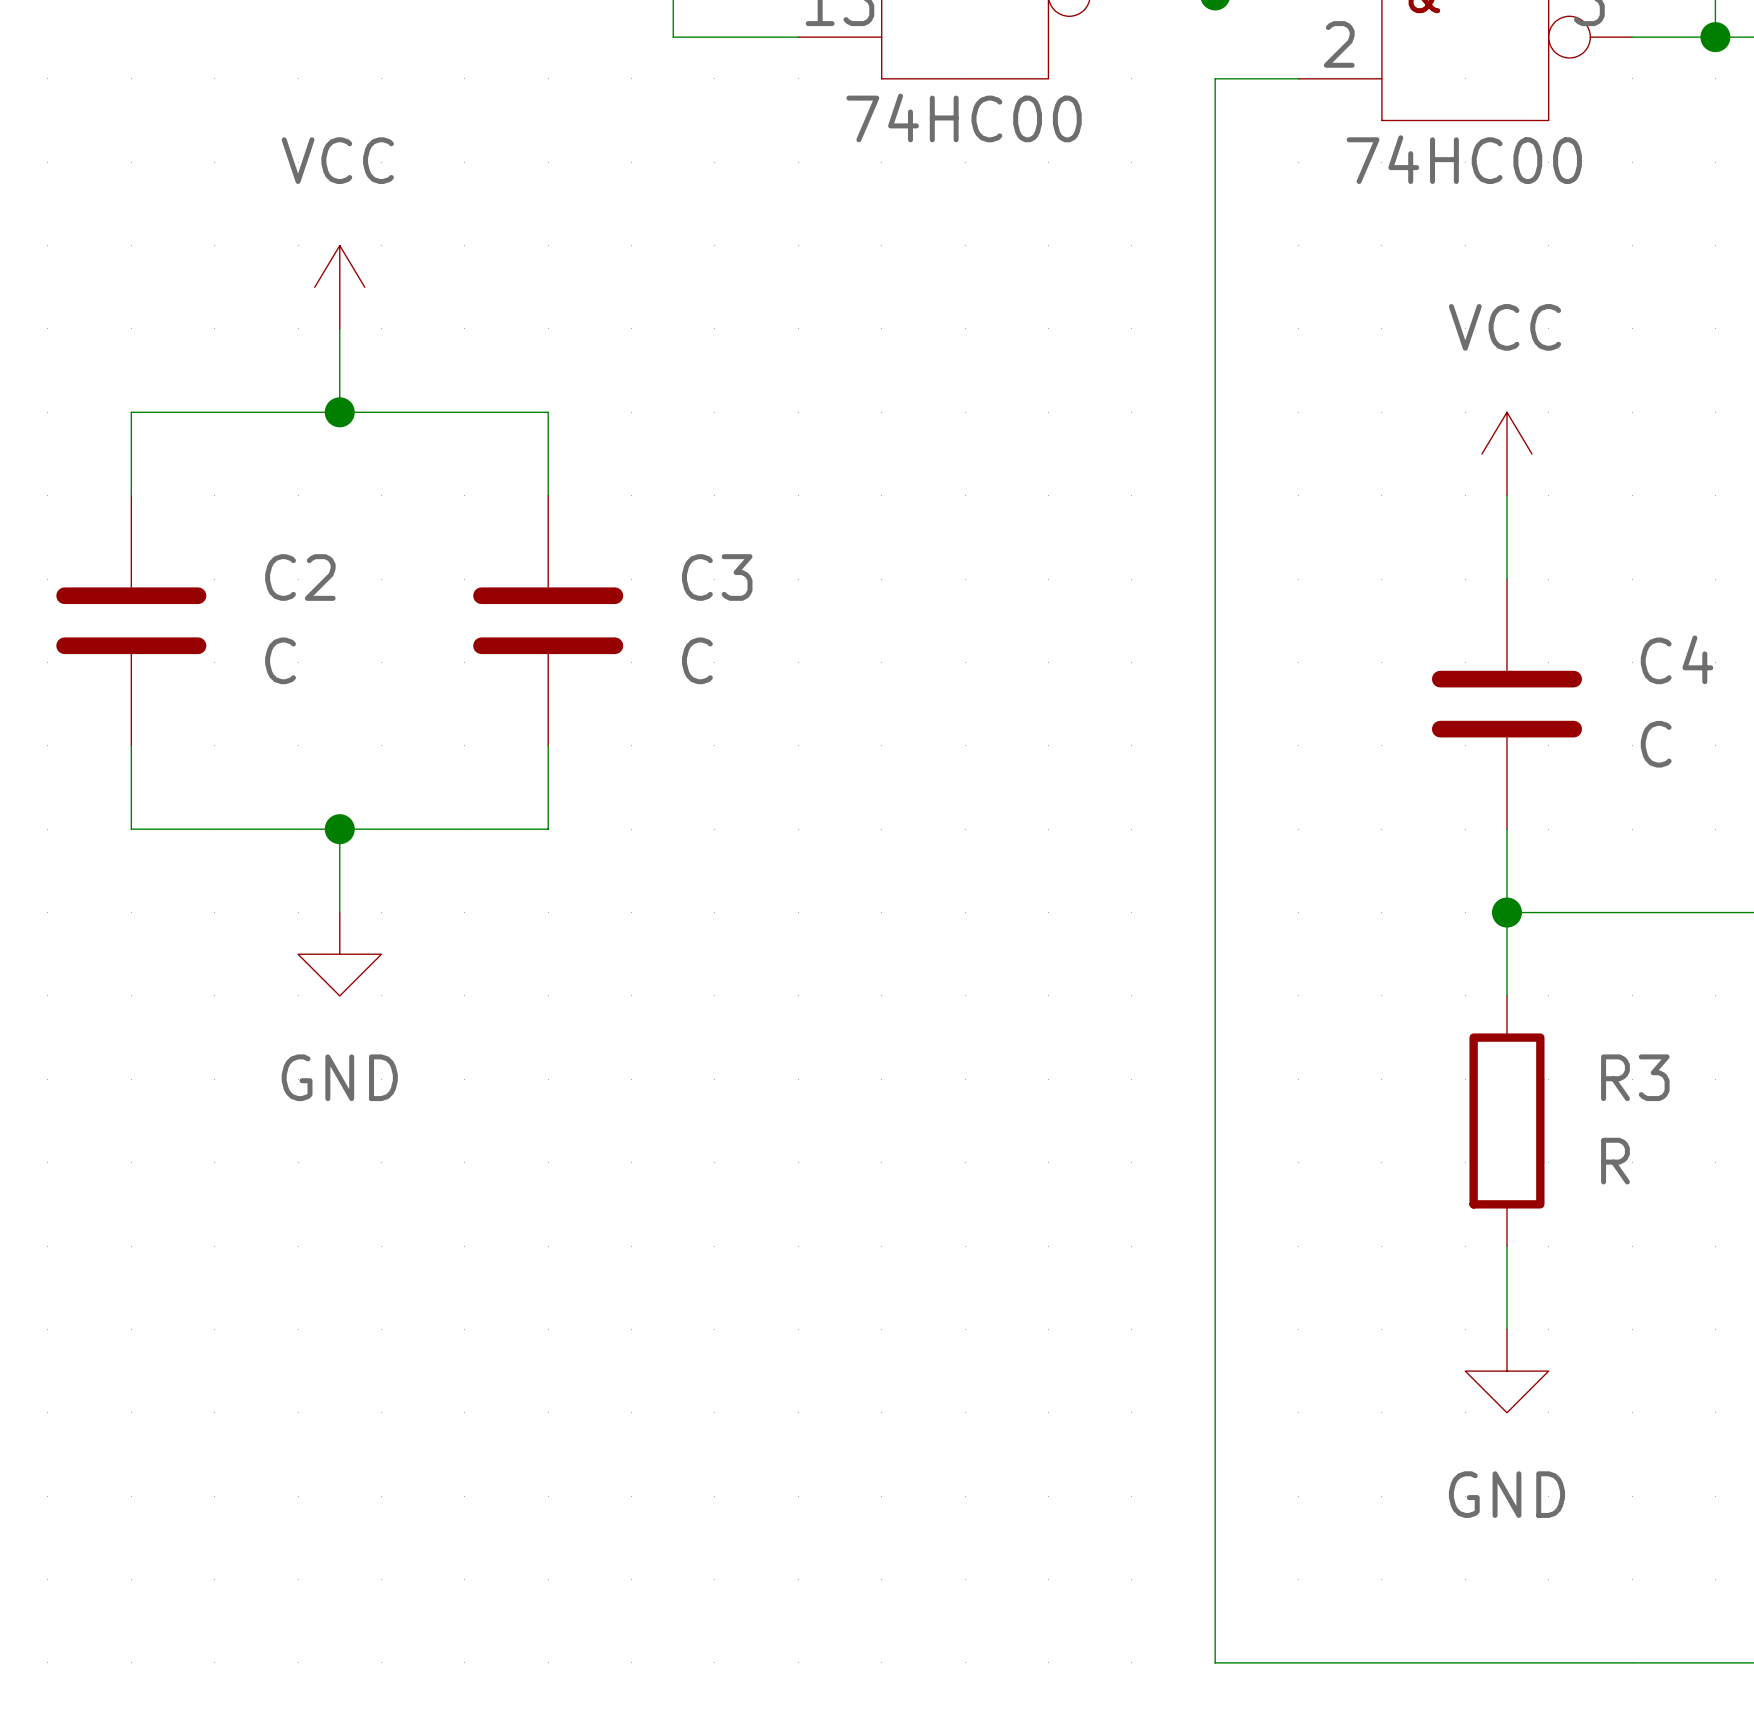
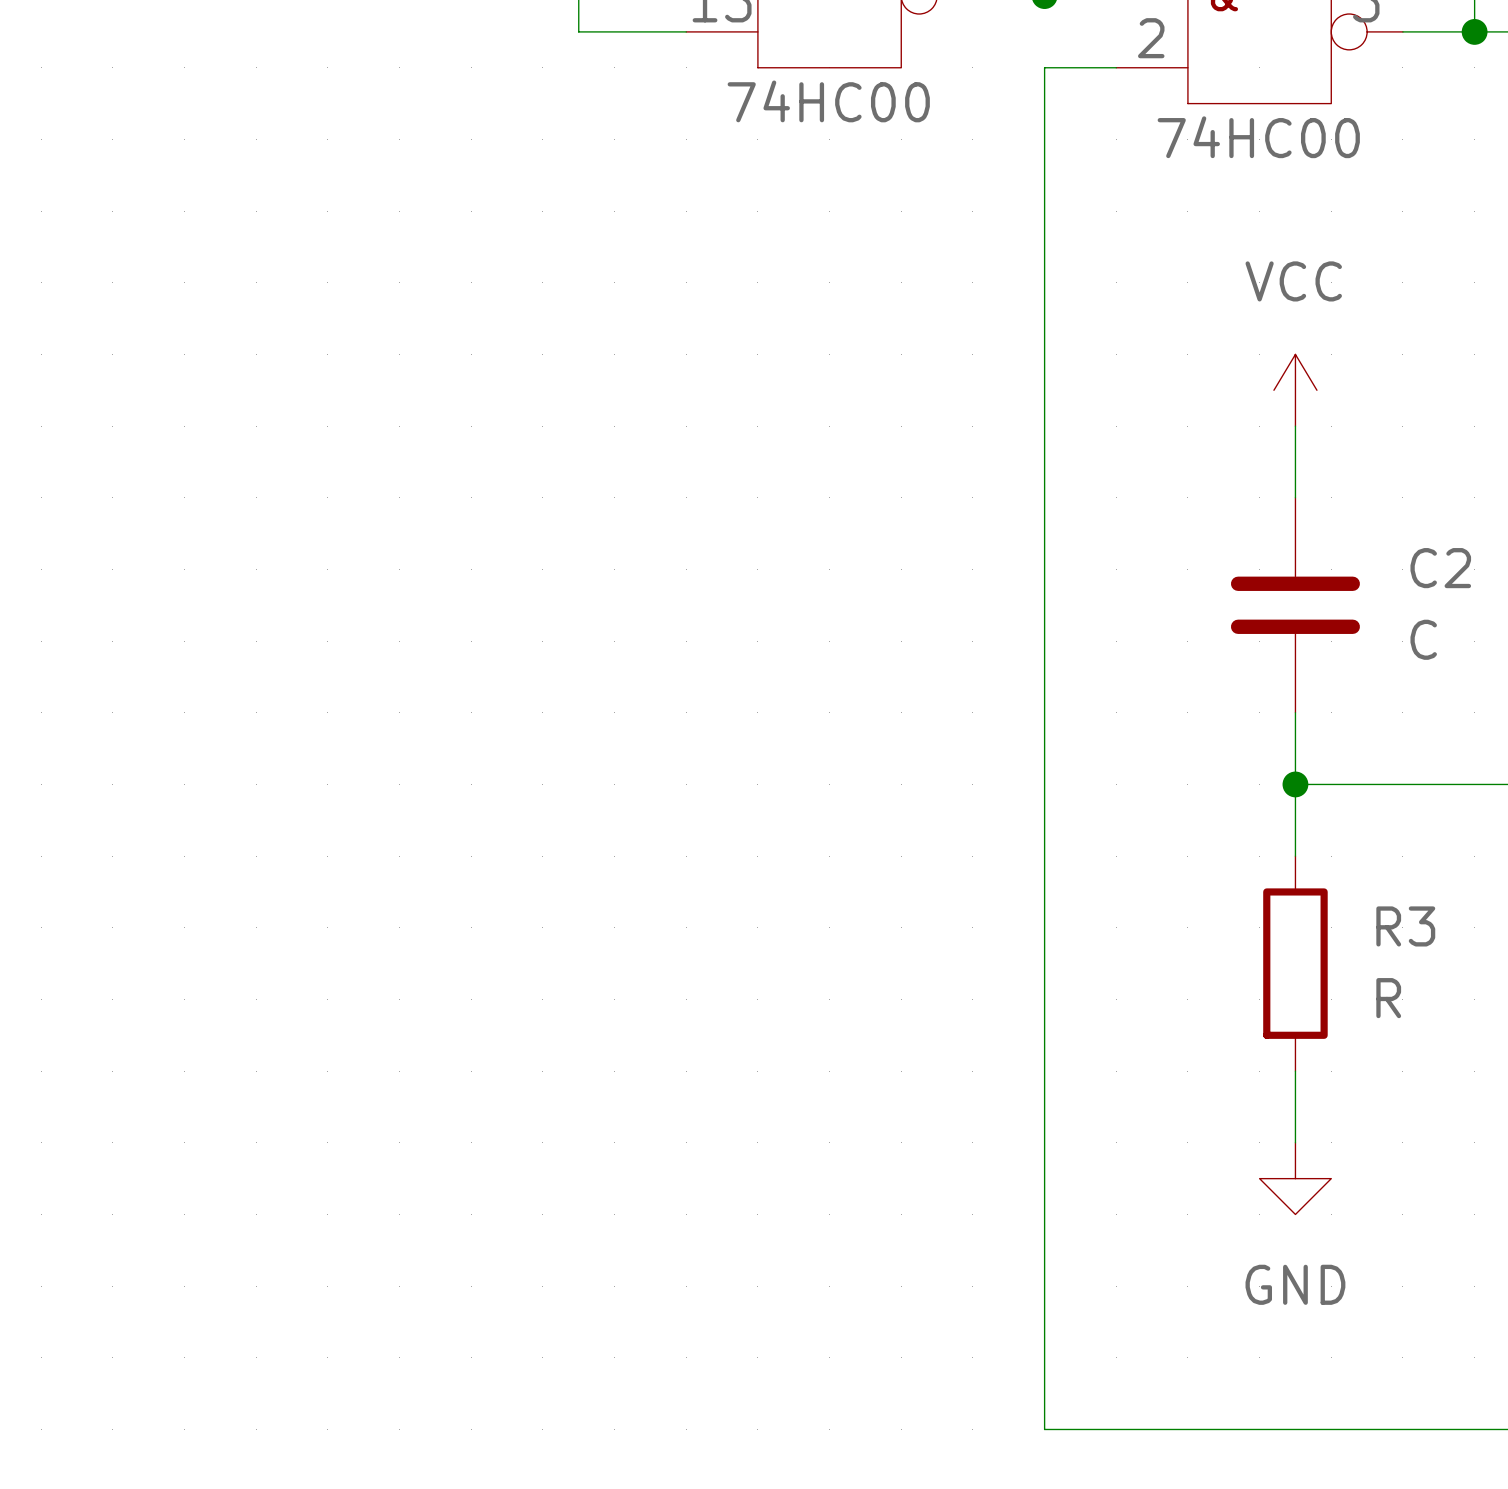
power symbol: VCC (339, 287) -> none
wire: (339, 328) (339, 412) -> none
junction: (339, 412) -> none
wire: (131, 495) (131, 412) (548, 412) (548, 495) -> none
C2: C (131, 620) -> none
C3: C (548, 620) -> none
C4 name: C4 (1677, 659) -> C2 (1440, 568)
wire: (131, 745) (131, 829) (548, 829) (548, 745) -> none
wire: (339, 829) (339, 912) -> none
junction: (339, 829) -> none
power symbol: GND (339, 954) -> none

